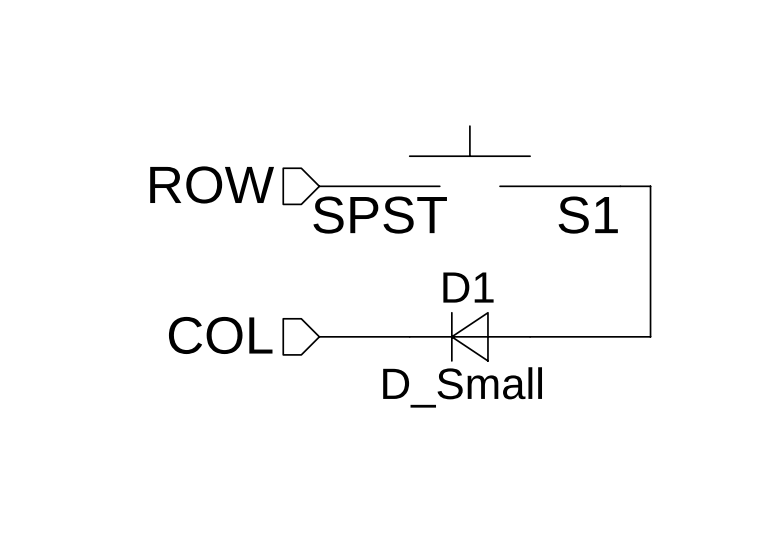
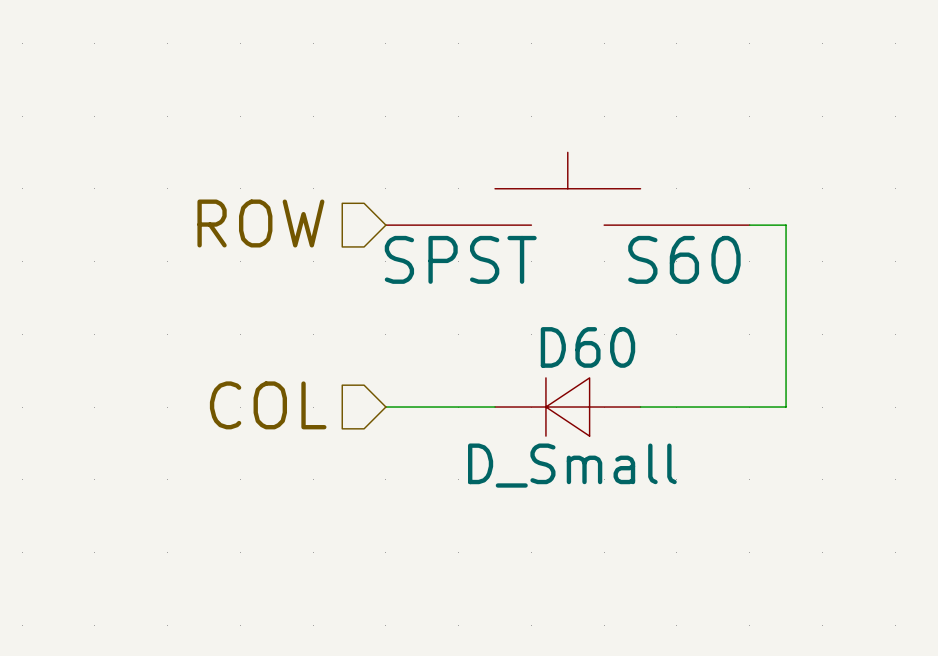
S1 name: S1 (588, 215) -> S60 (684, 259)
D1 name: D1 (468, 287) -> D60 (587, 347)

